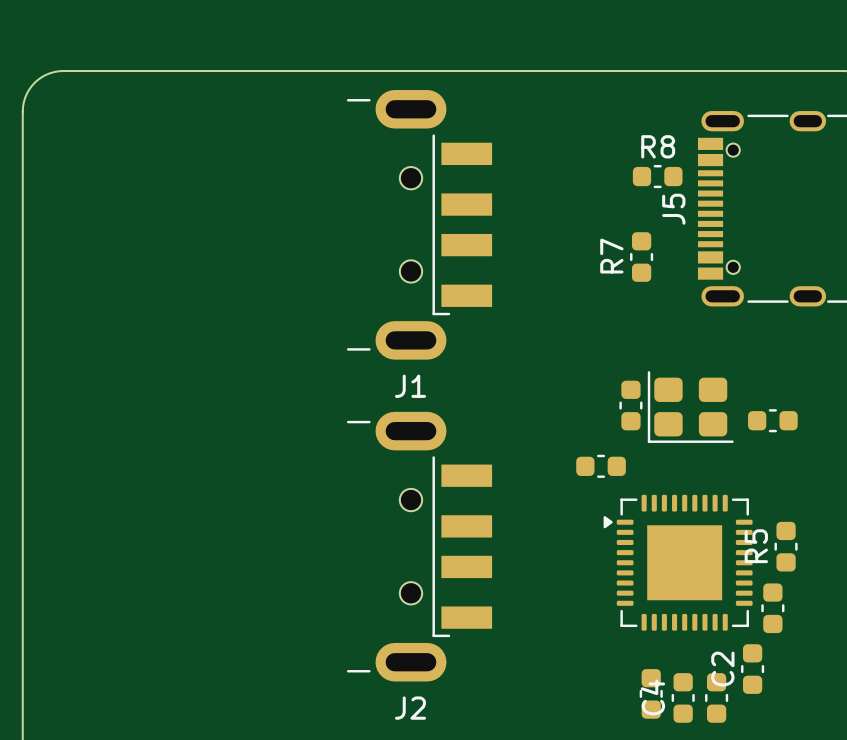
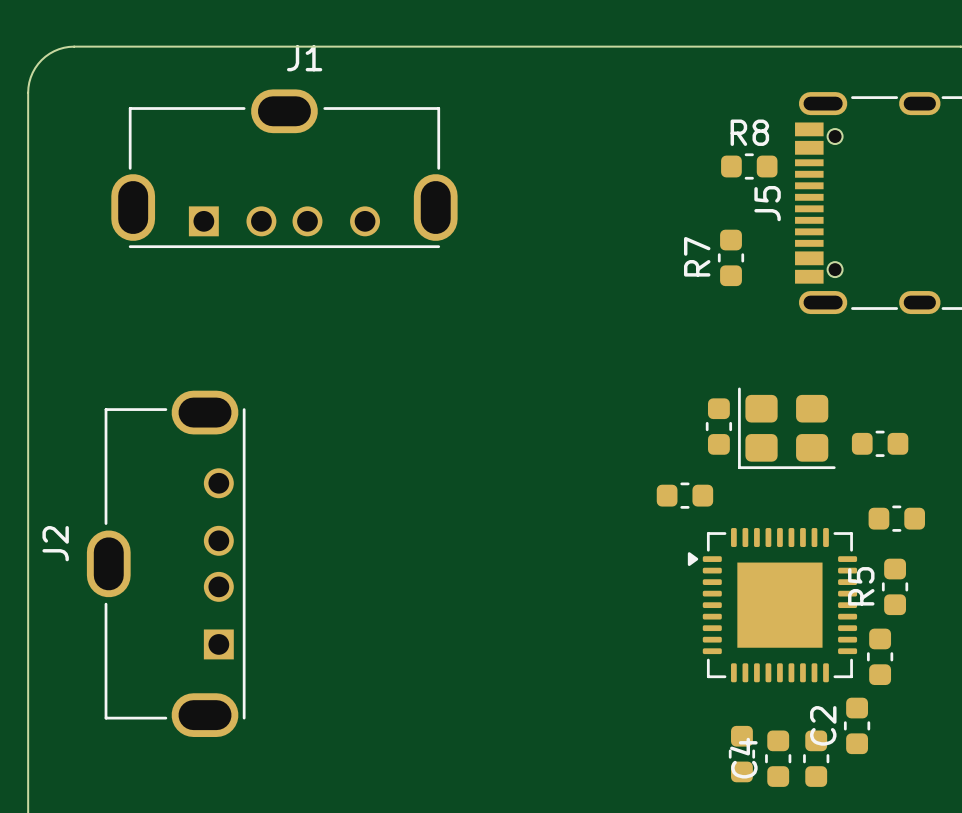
J1 footprint: [346, 90, 493, 360] -> [111, 89, 458, 249]
J1 name position: J1 (410, 386) -> J1 (304, 58)
J2 footprint: [346, 411, 493, 682] -> [86, 390, 246, 737]
part: none -> (896, 518)
J2 name position: J2 (410, 708) -> J2 (55, 543)

